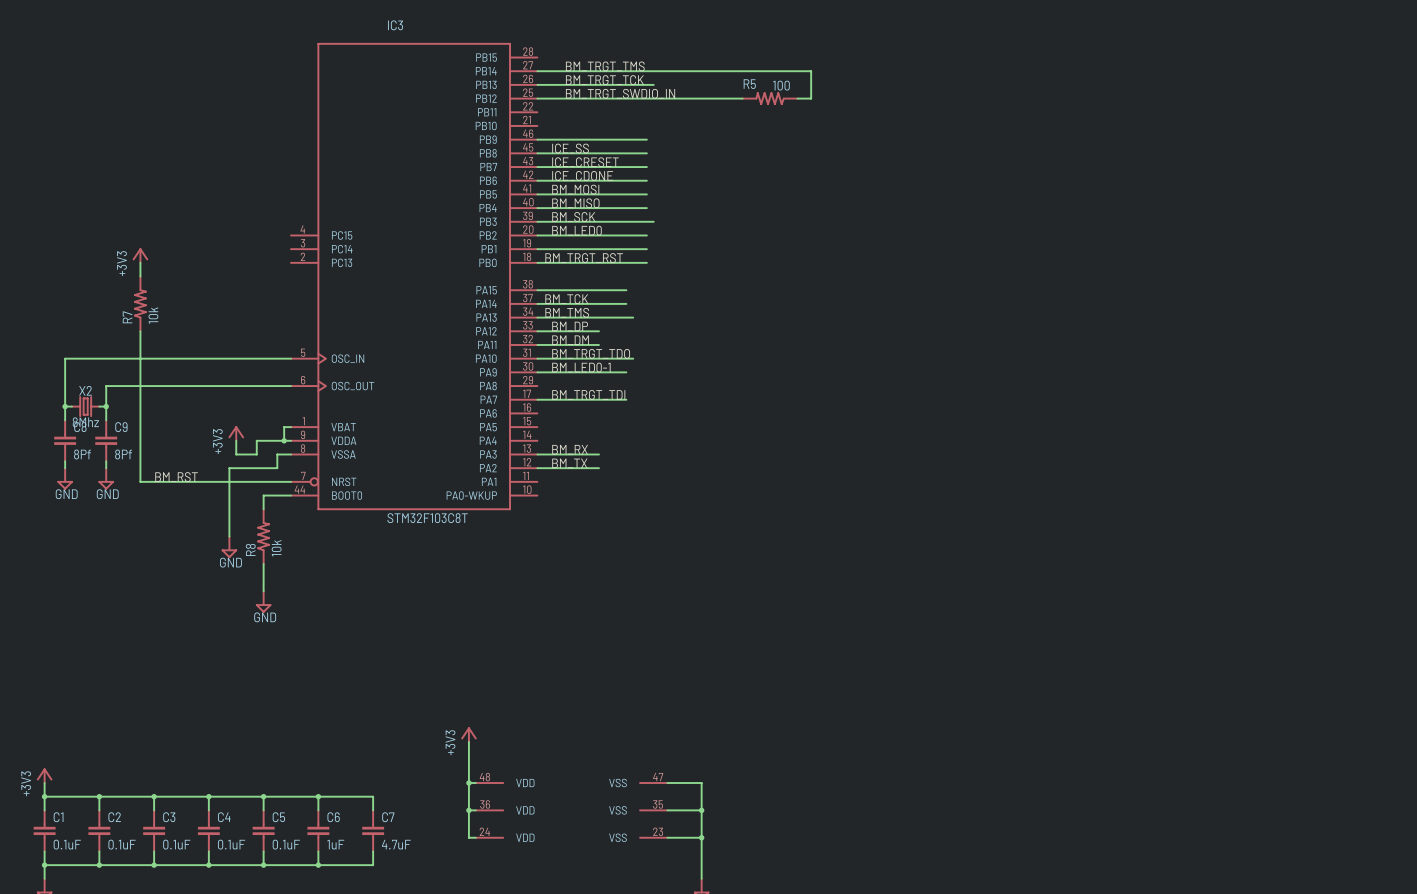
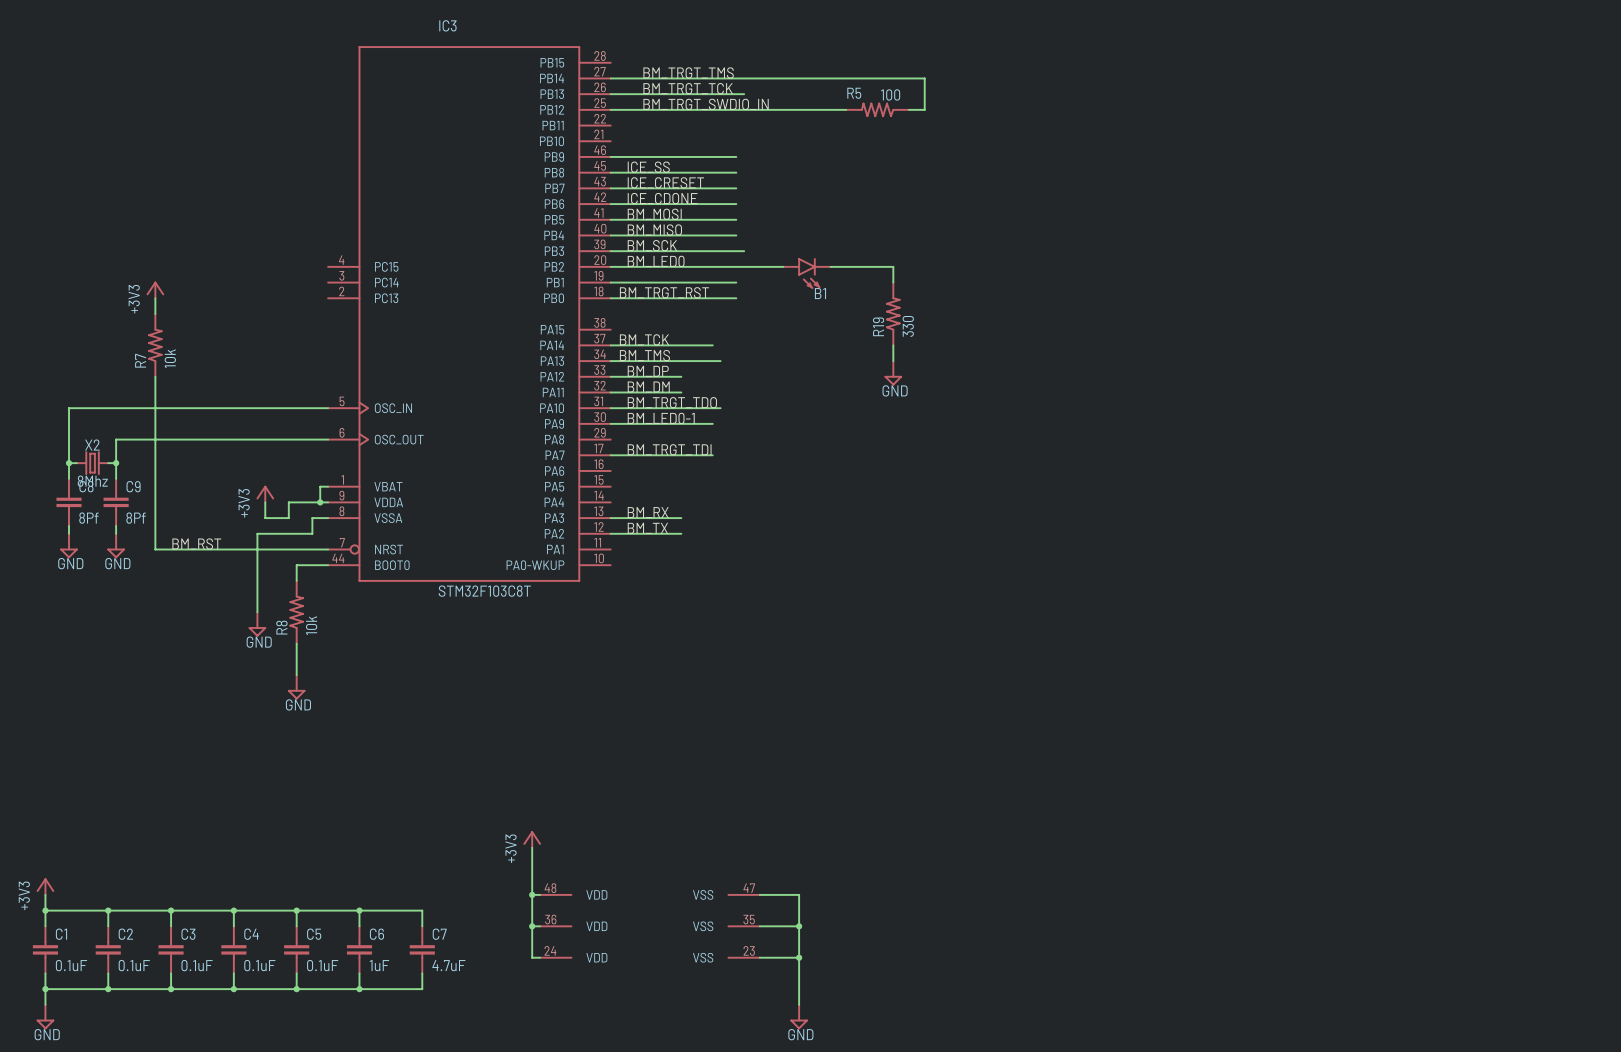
wire: none -> (736, 266) (783, 266)
wire: none -> (830, 266) (893, 266) (893, 282)
B1: none -> (806, 273)
R19: none -> 330 (893, 313)
wire: (537, 290) (626, 290) -> none
wire: none -> (893, 345) (893, 361)
power symbol: none -> GND (893, 373)

